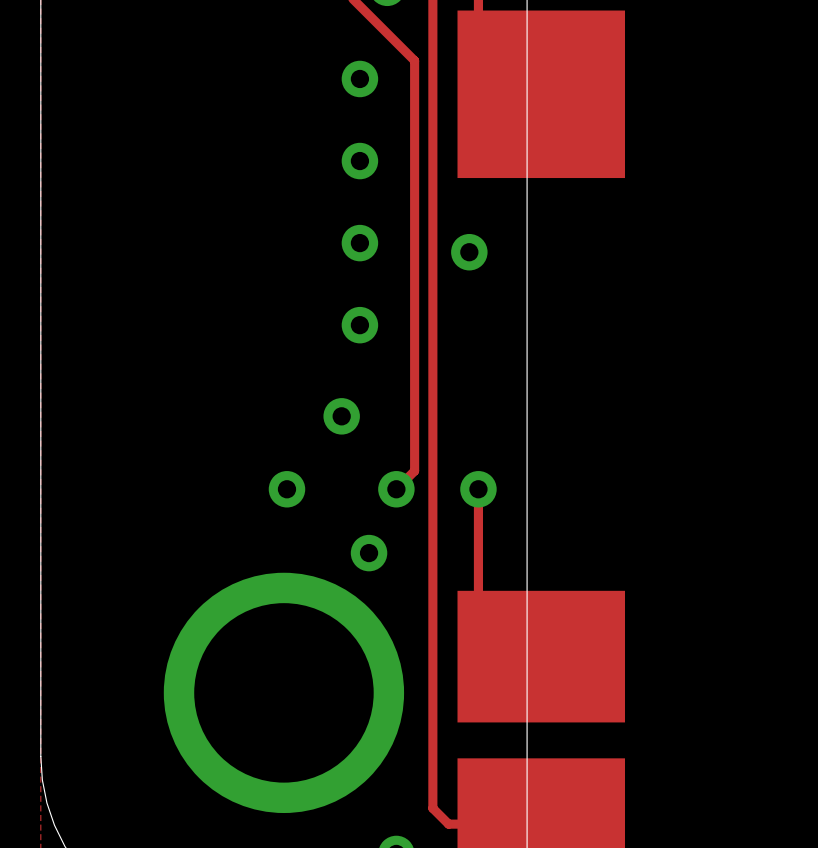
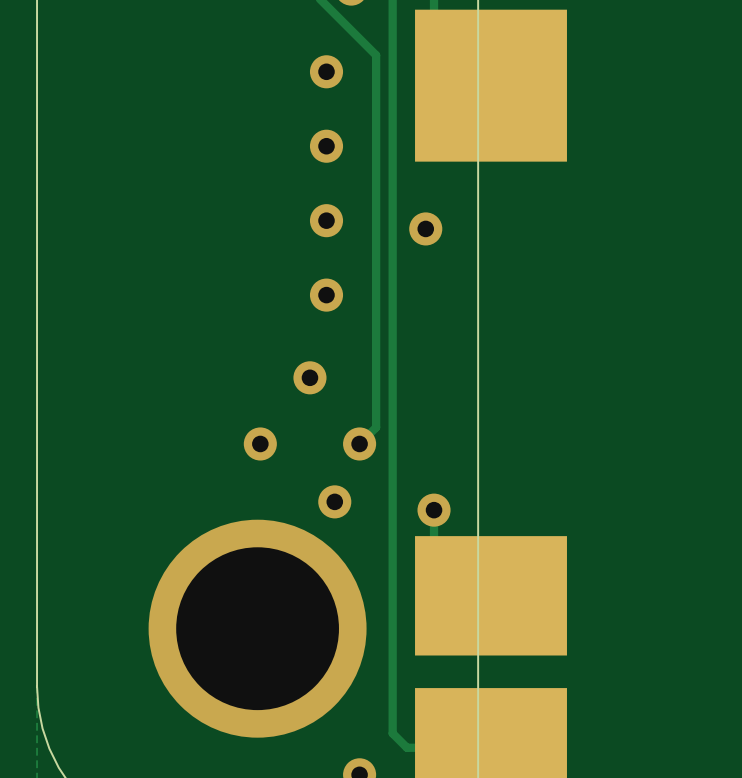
track: (478, 489) (478, 562) -> none
via position: (478, 489) -> (434, 510)

